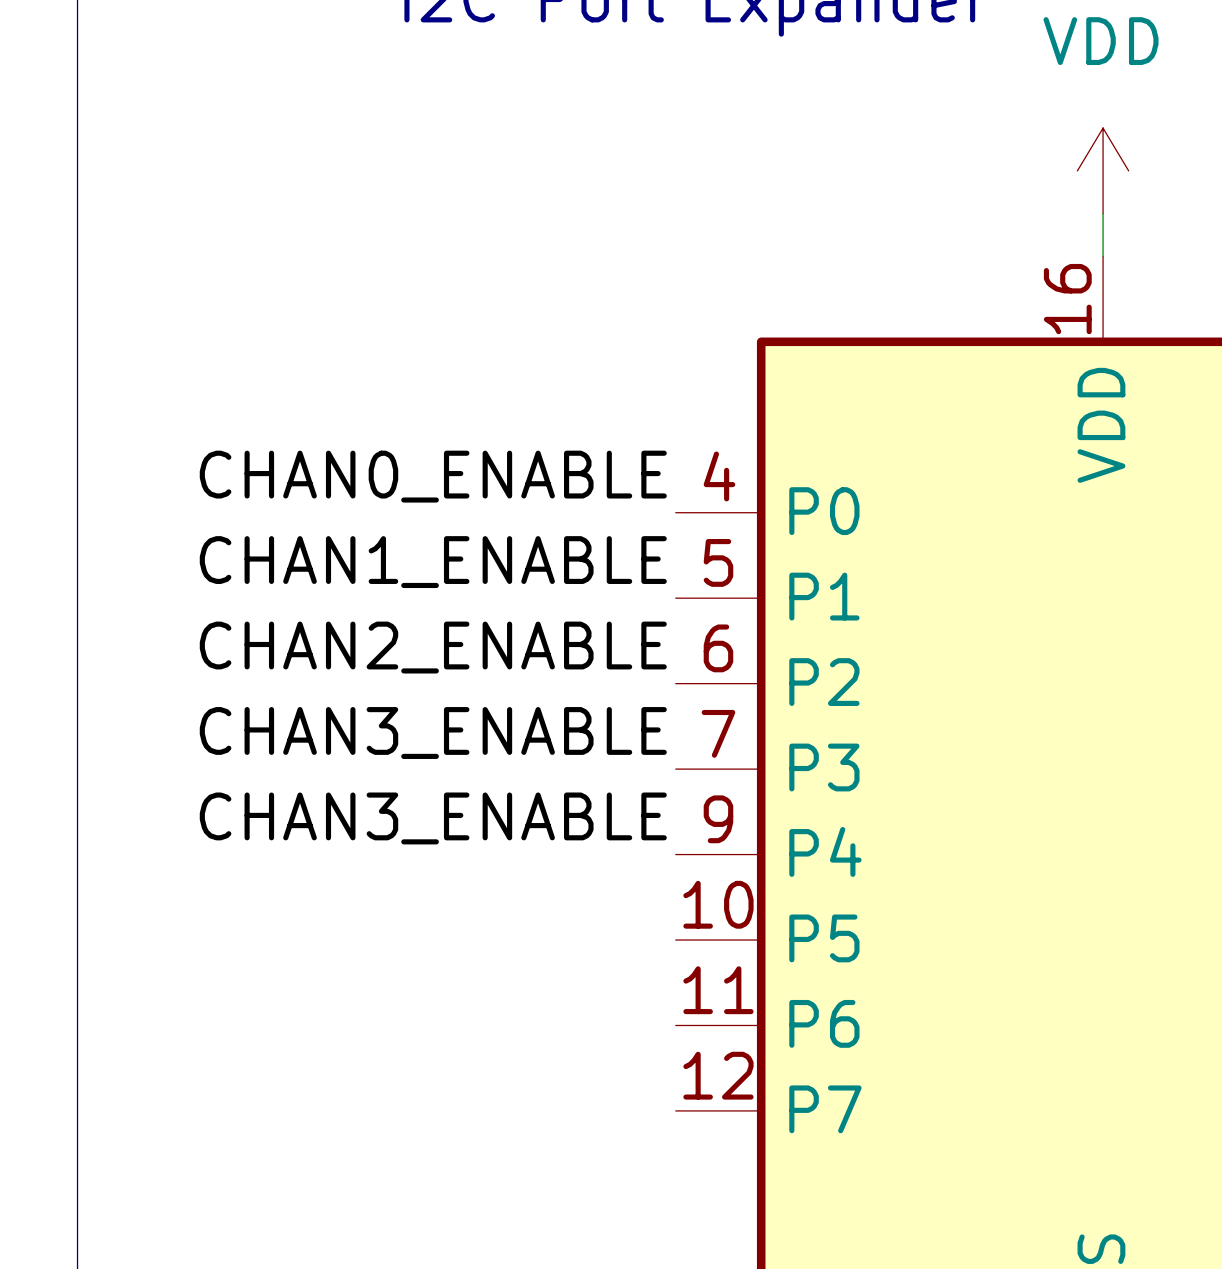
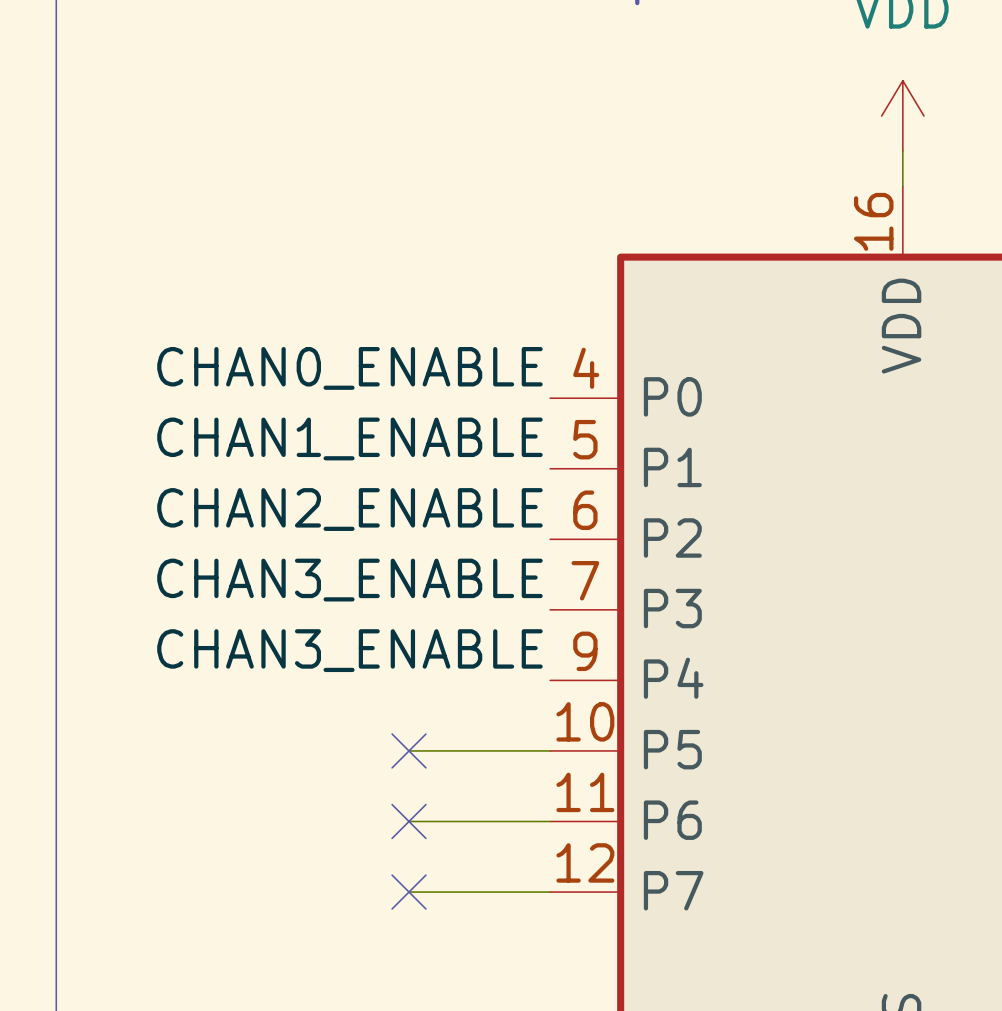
wire: none -> (409, 750) (550, 750)
no-connect mark: none -> (409, 750)
wire: none -> (409, 821) (550, 821)
no-connect mark: none -> (409, 821)
wire: none -> (409, 892) (550, 892)
no-connect mark: none -> (409, 892)

